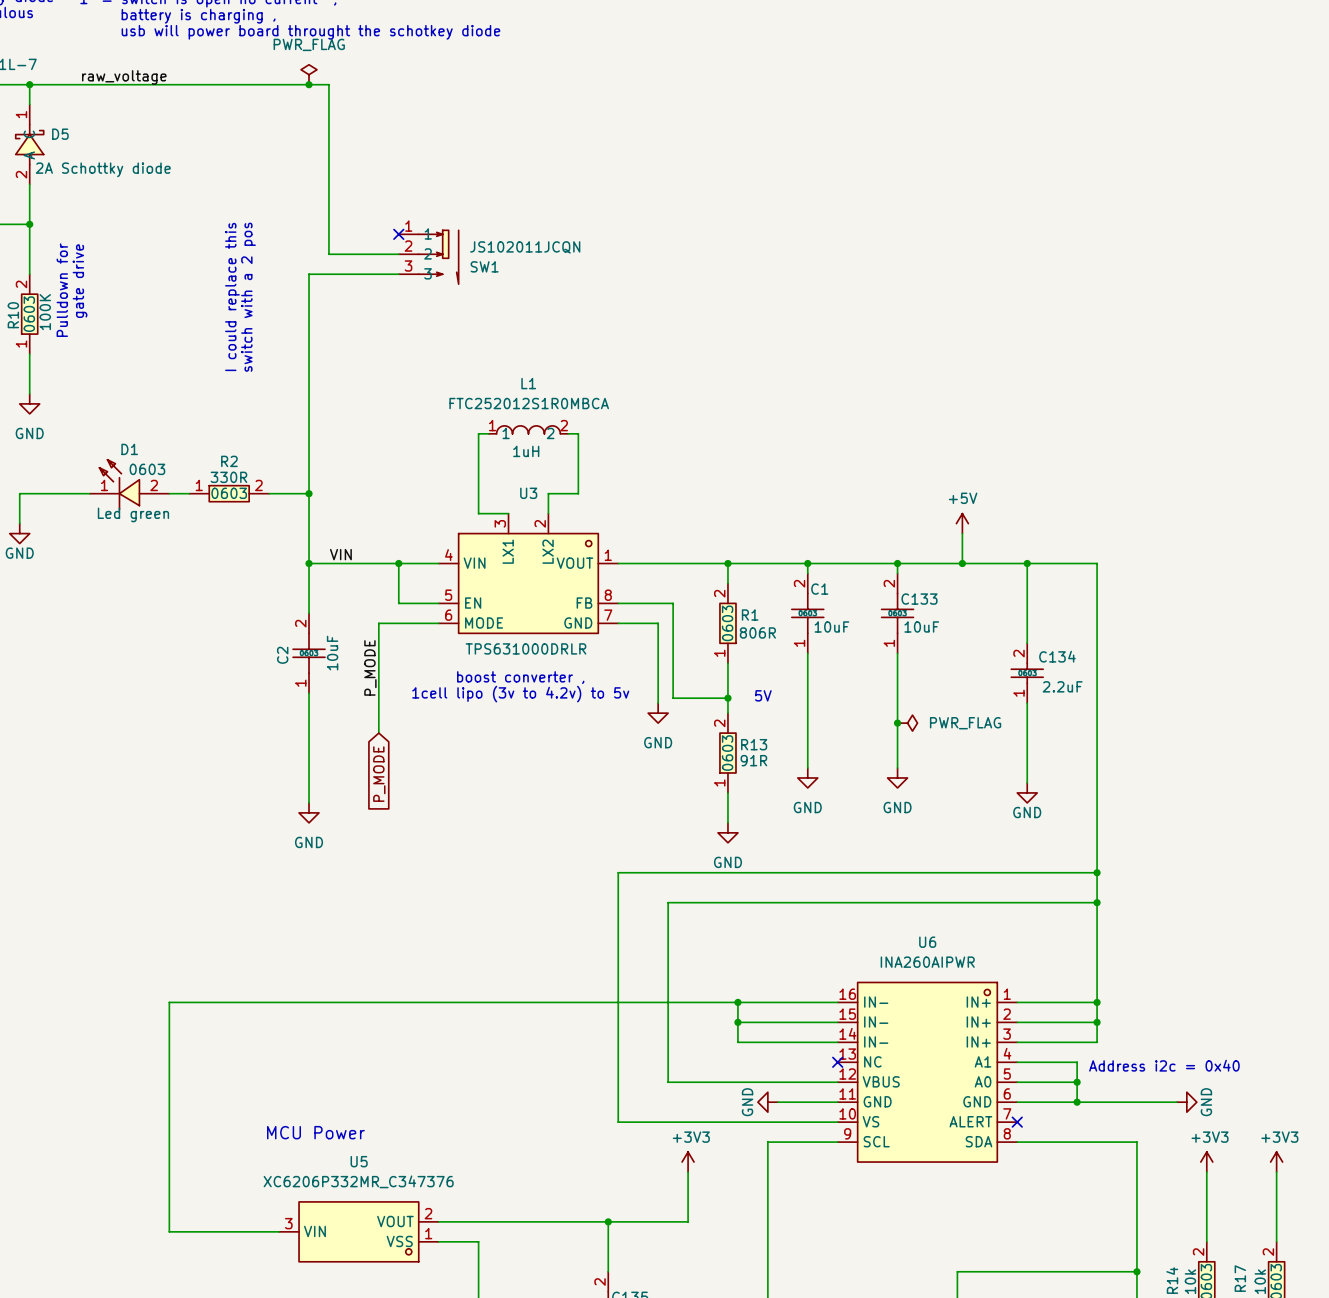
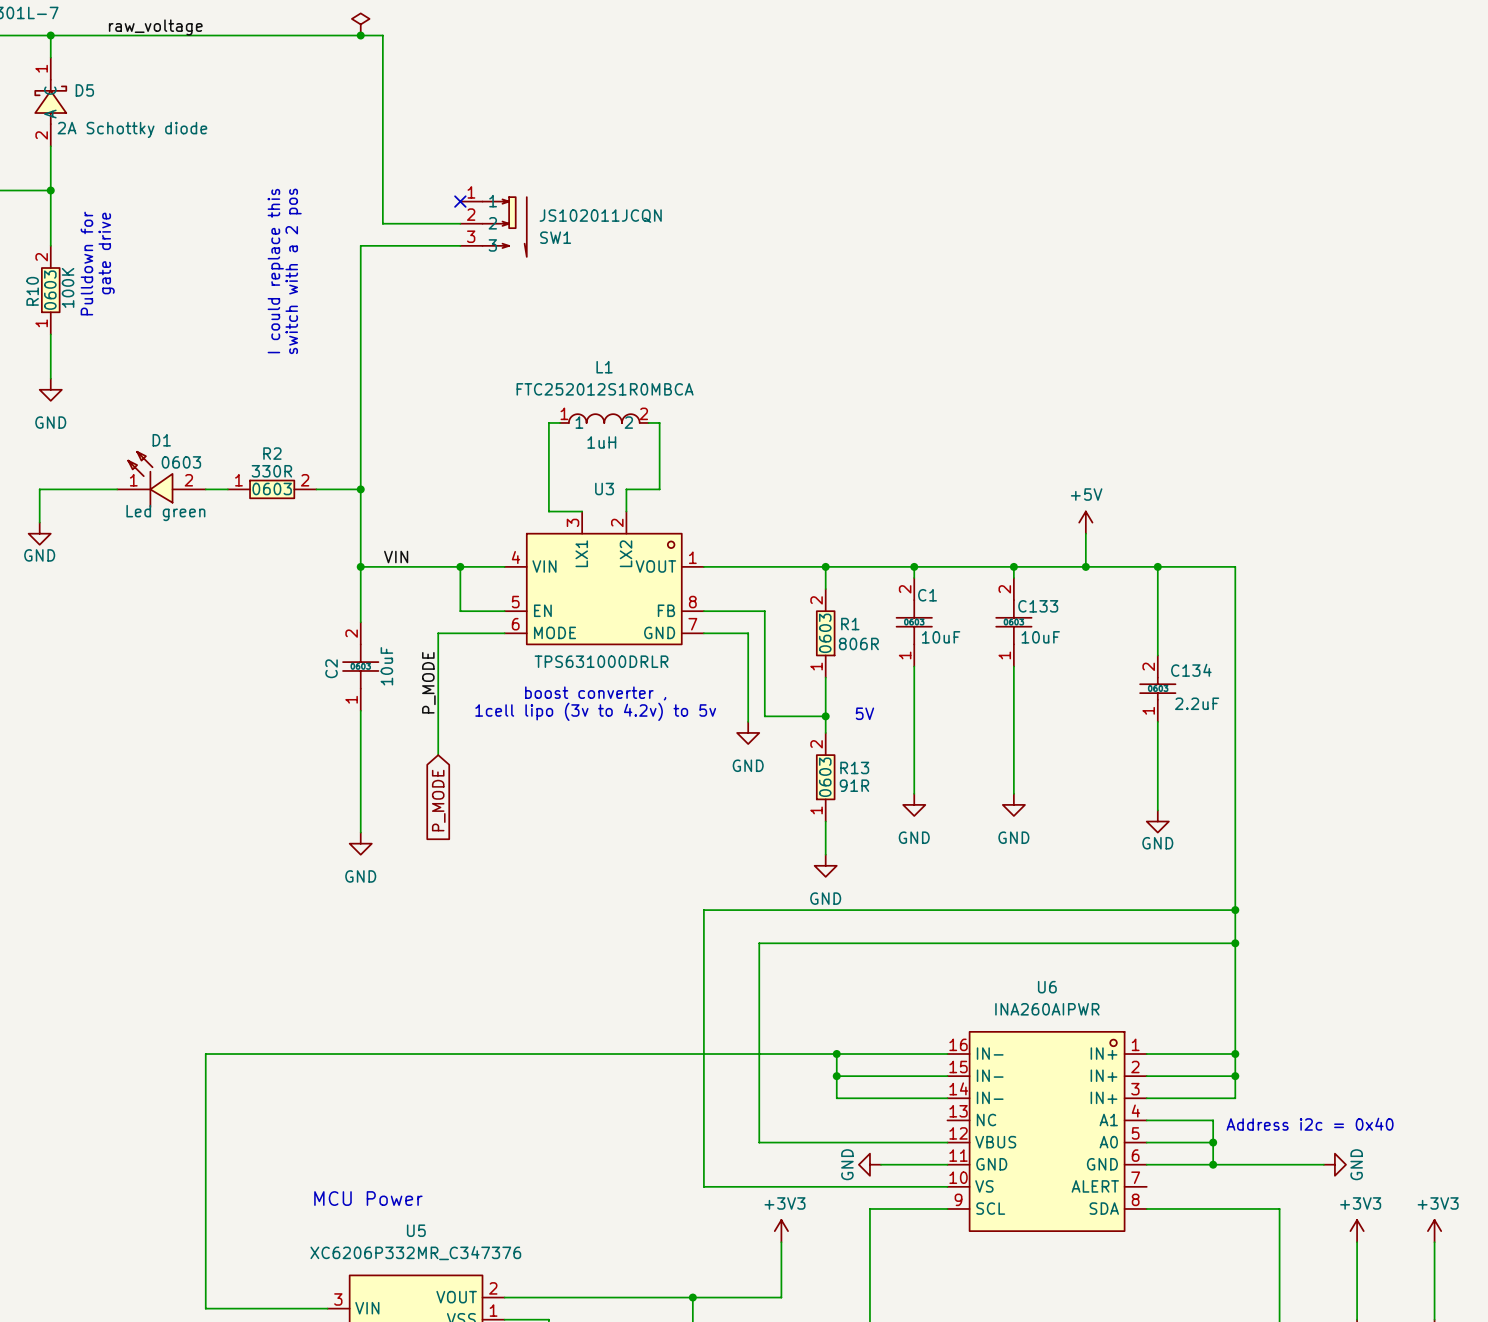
junction: (897, 723) -> none
power symbol: PWR_FLAG (907, 723) -> none
no-connect mark: (837, 1062) -> none
no-connect mark: (1017, 1122) -> none

